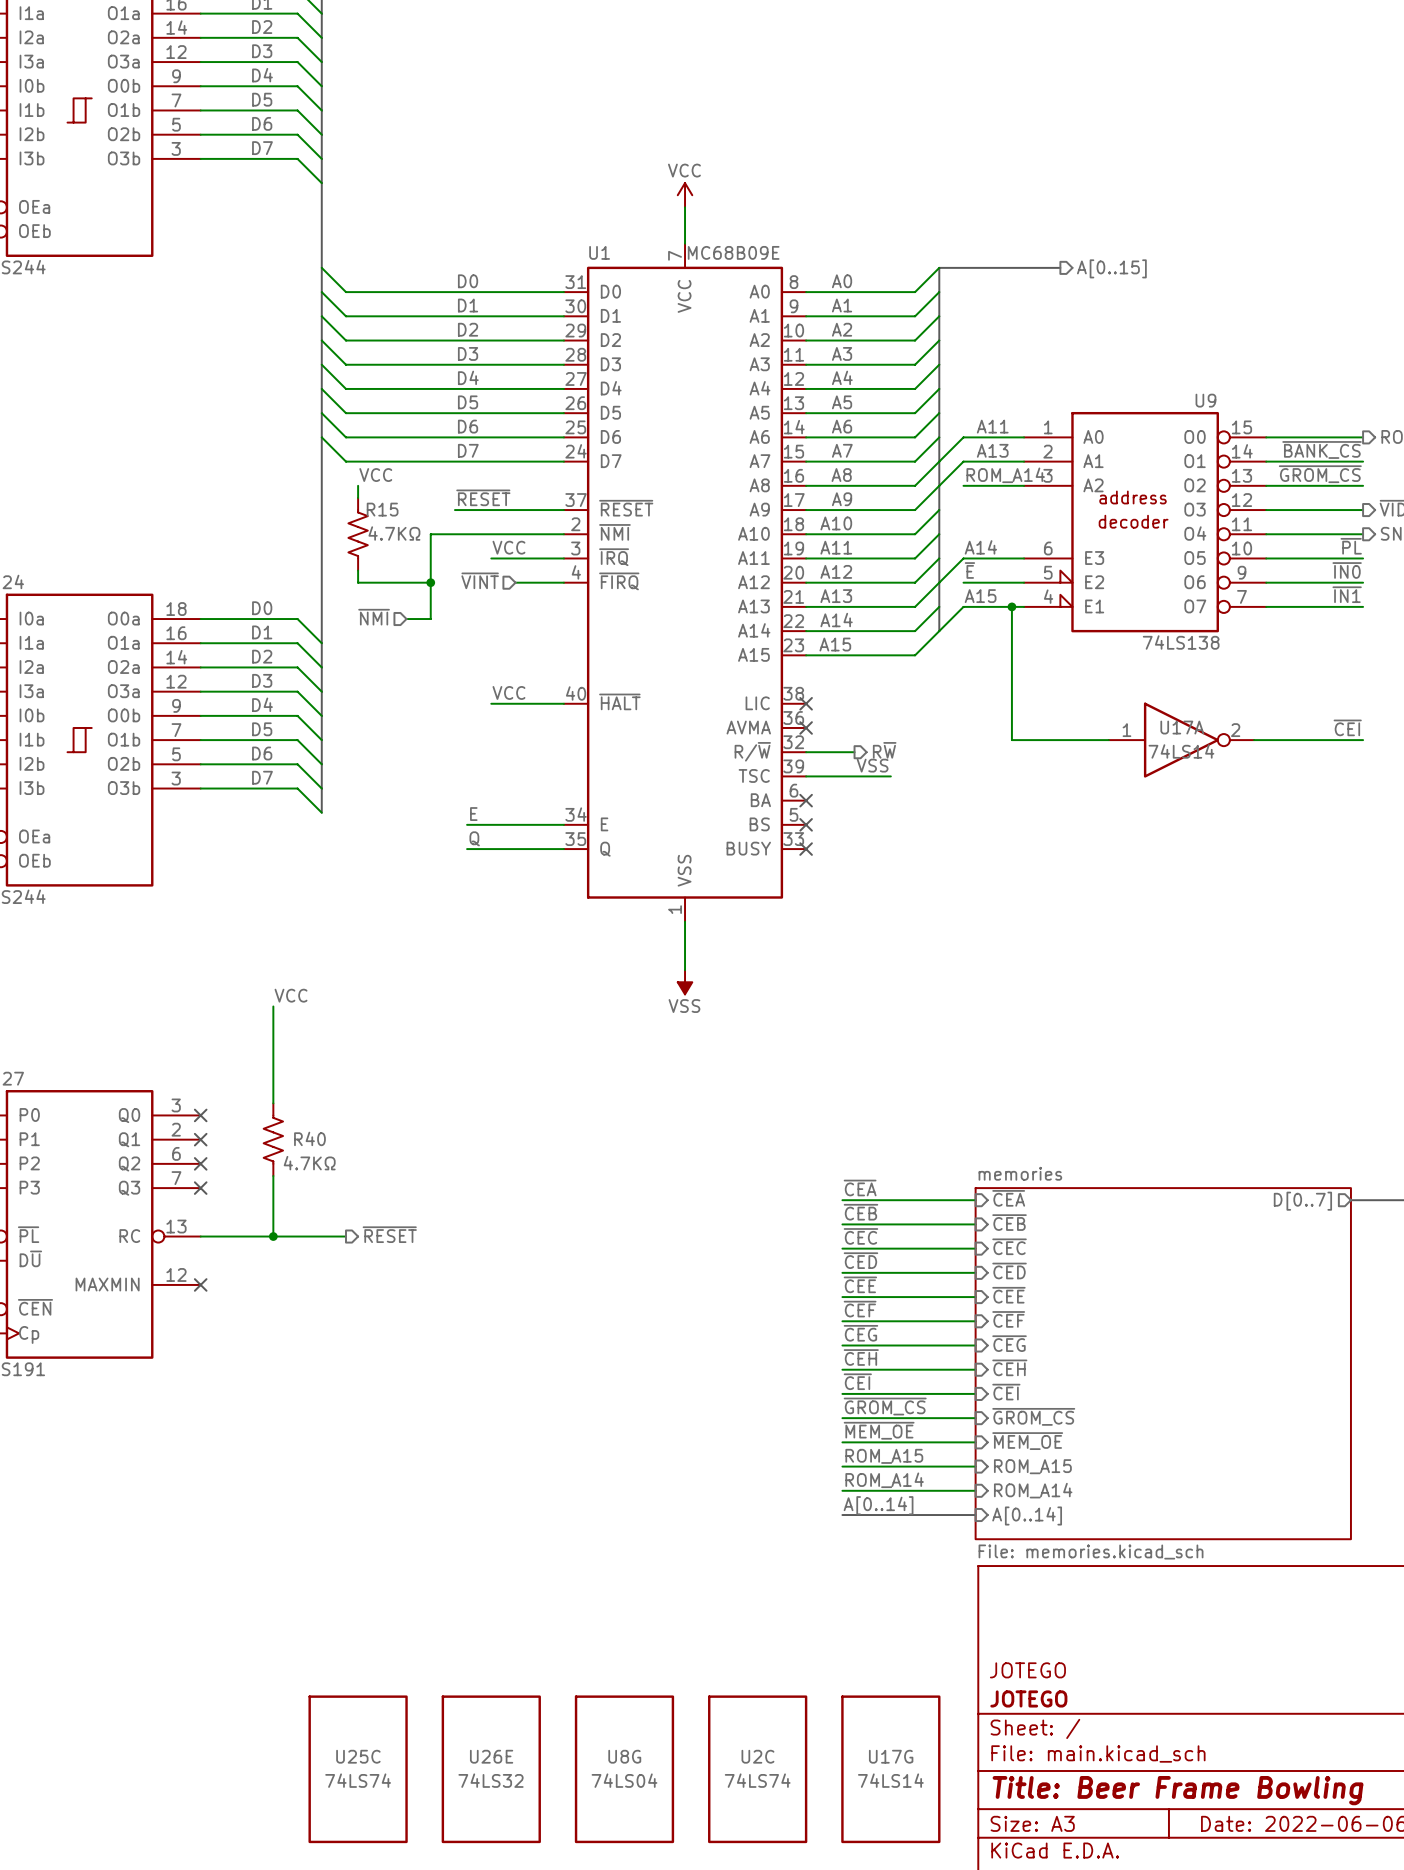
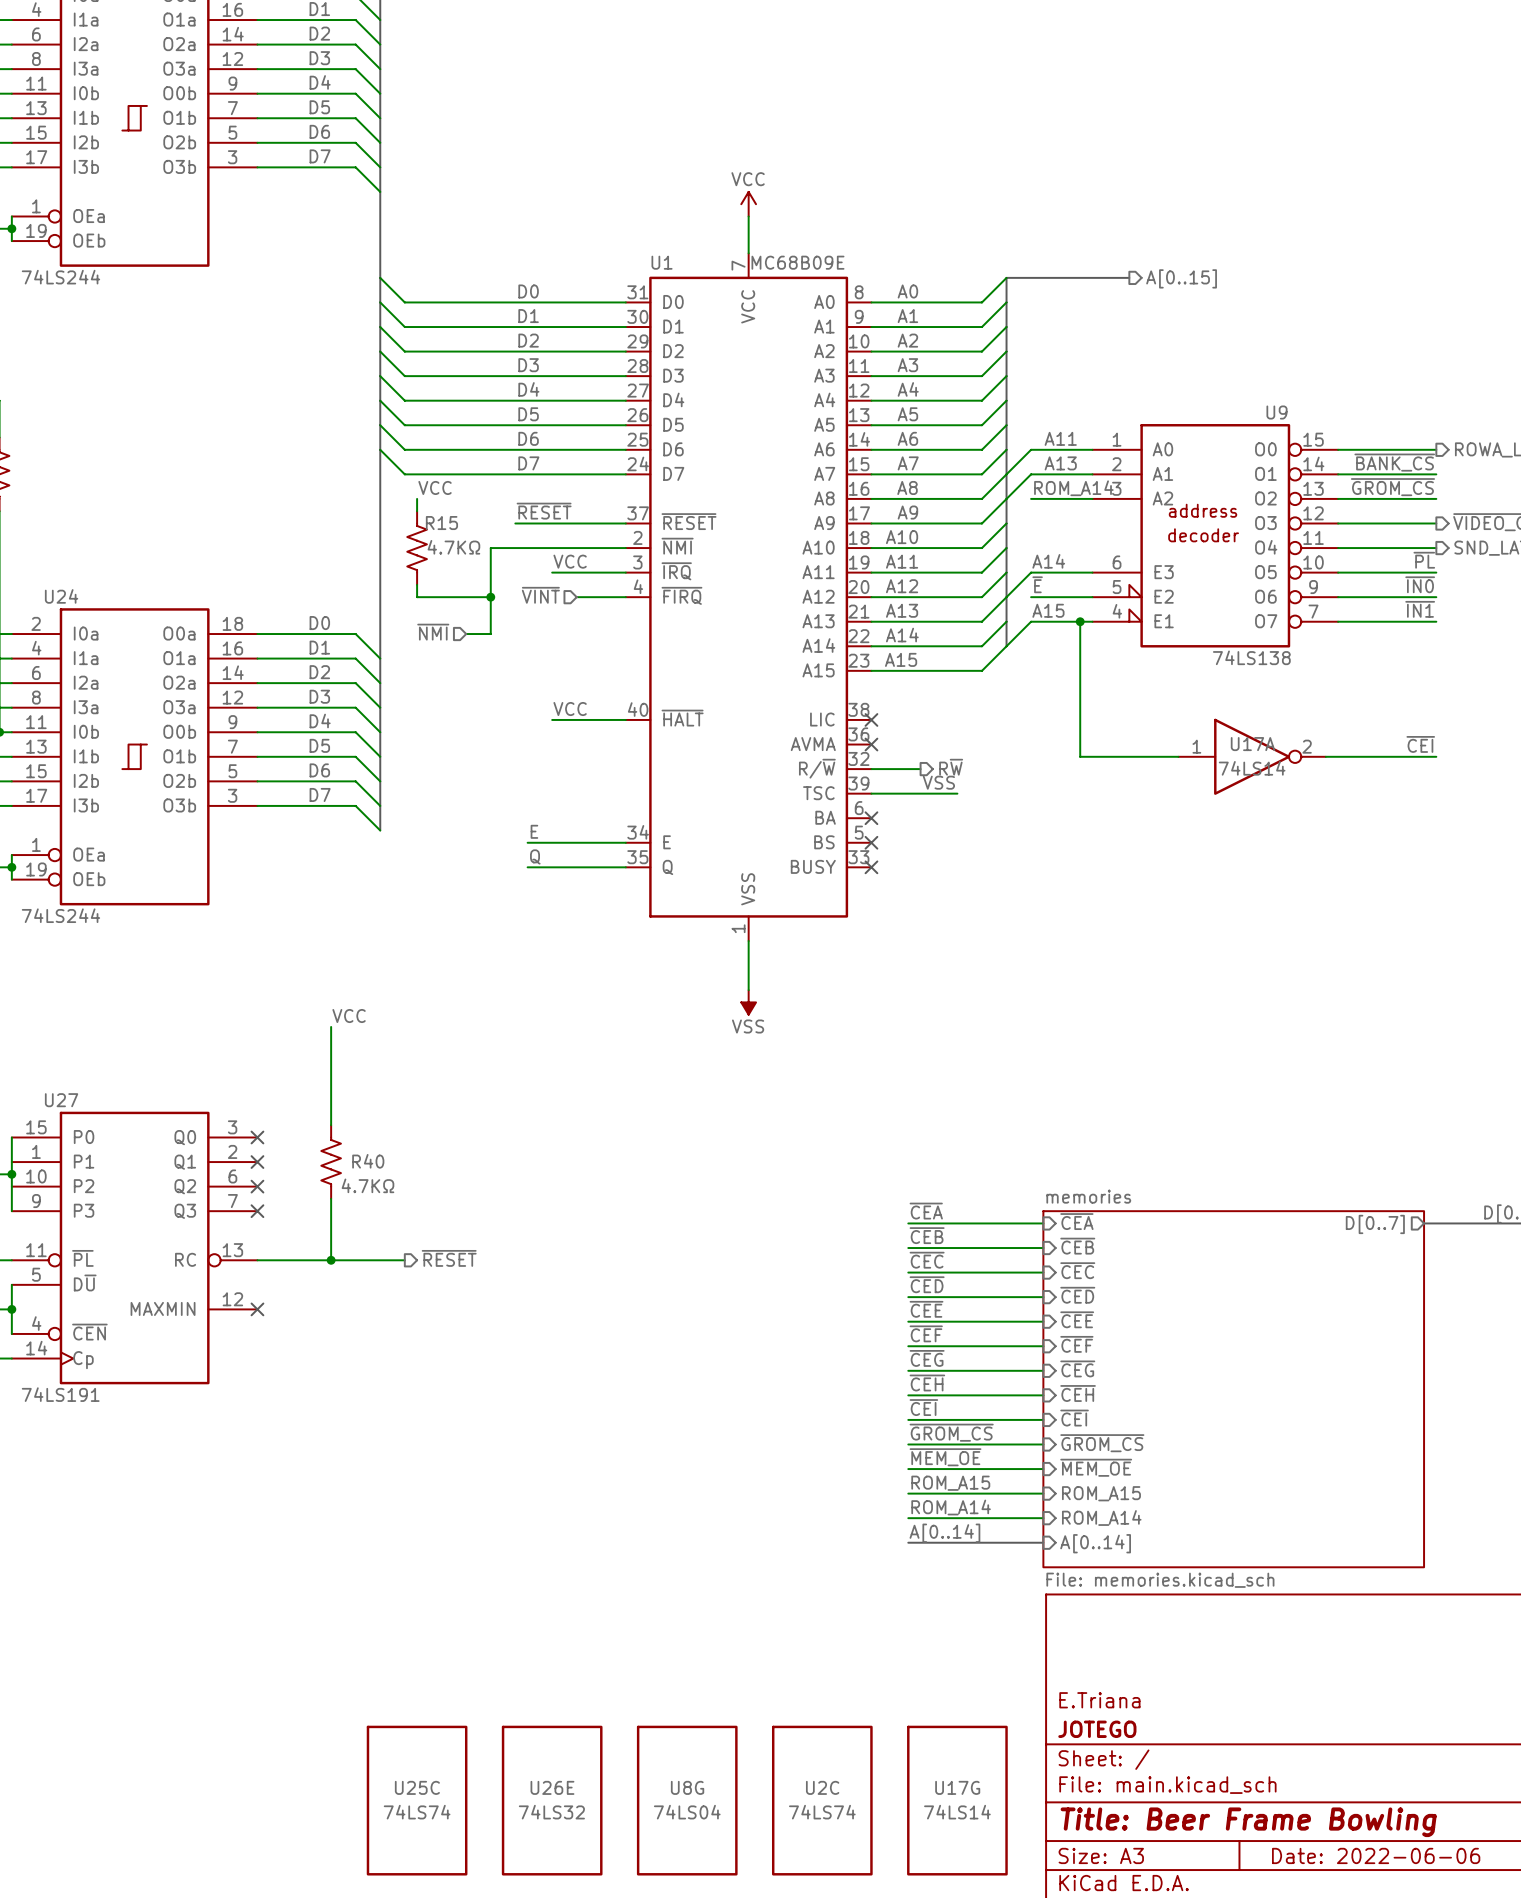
title block: JOTEGO (1027, 1670) -> E.Triana (1099, 1700)

